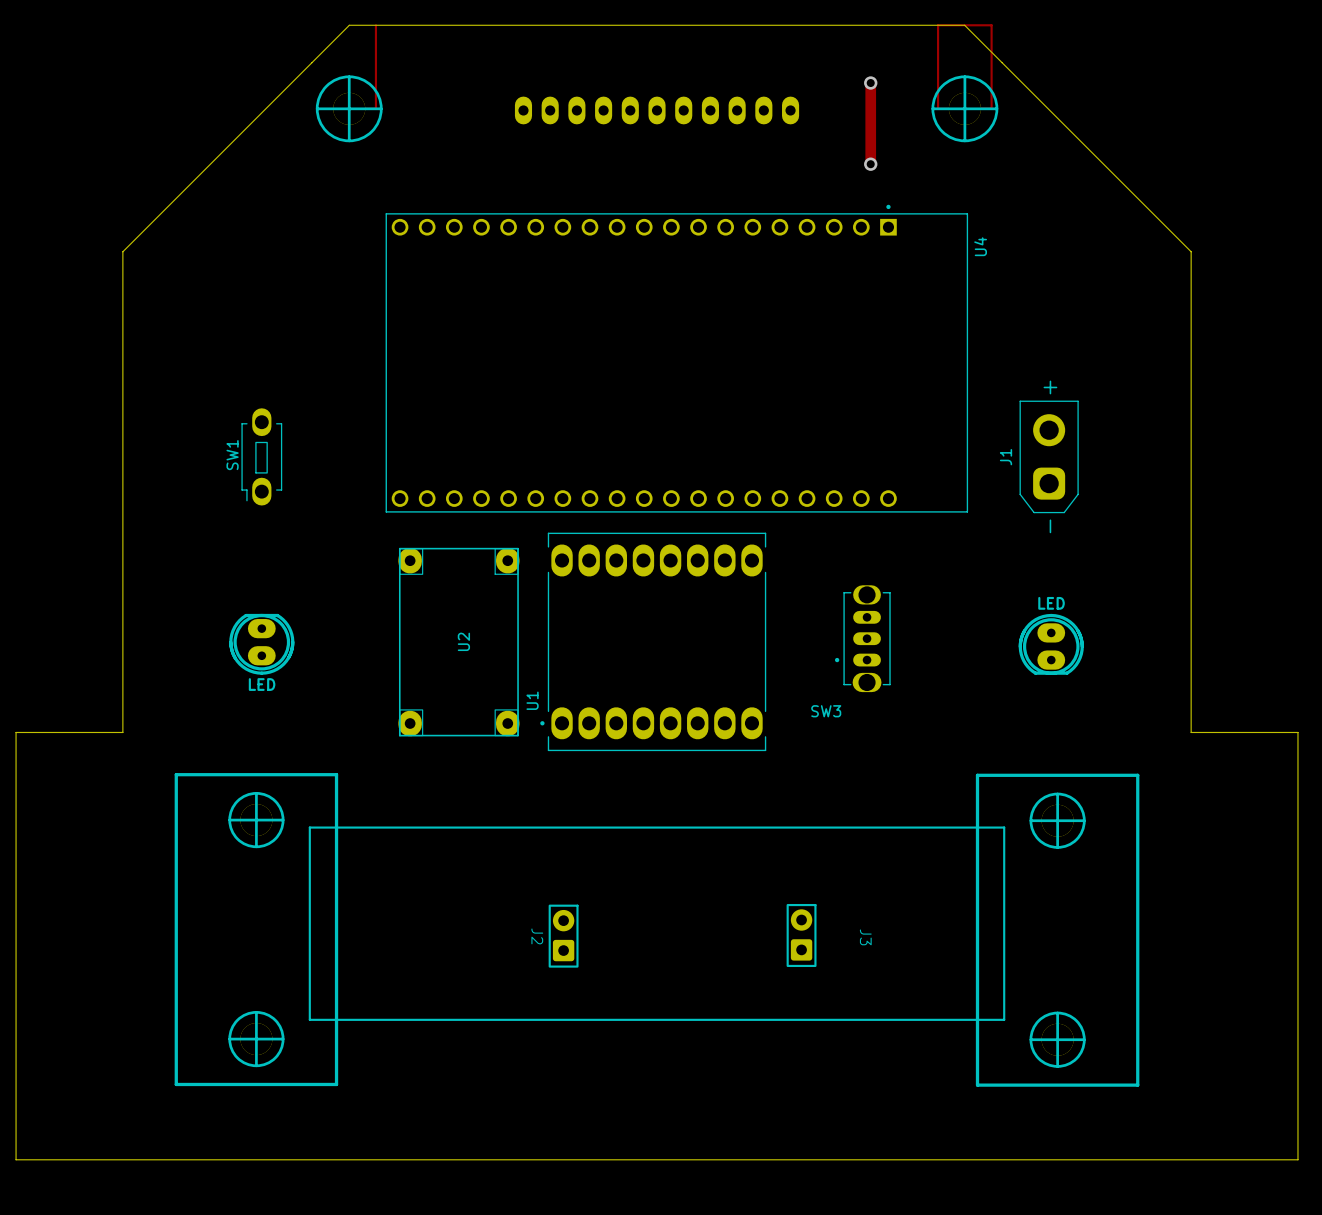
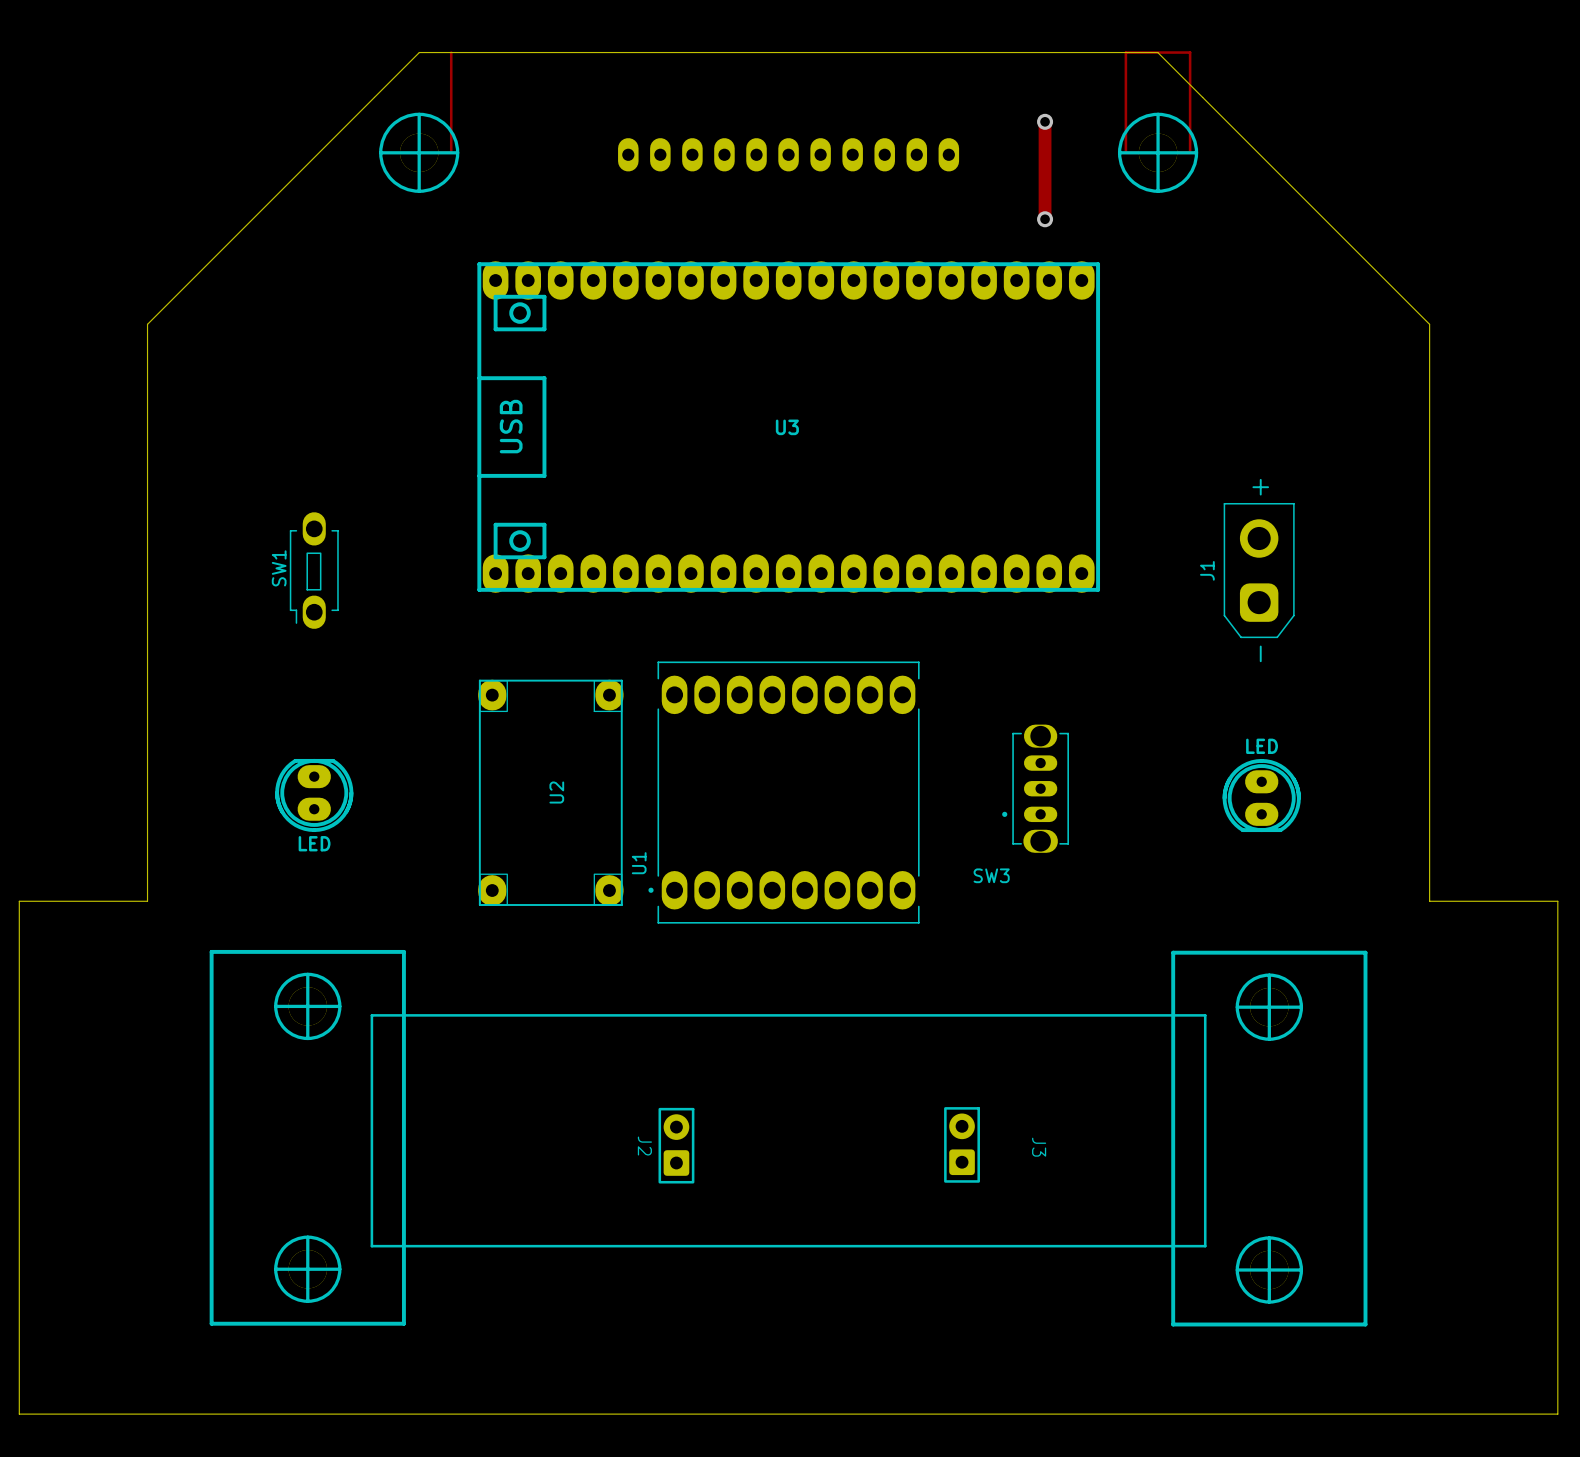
U3: none -> (788, 427)
U4: (676, 358) -> none

